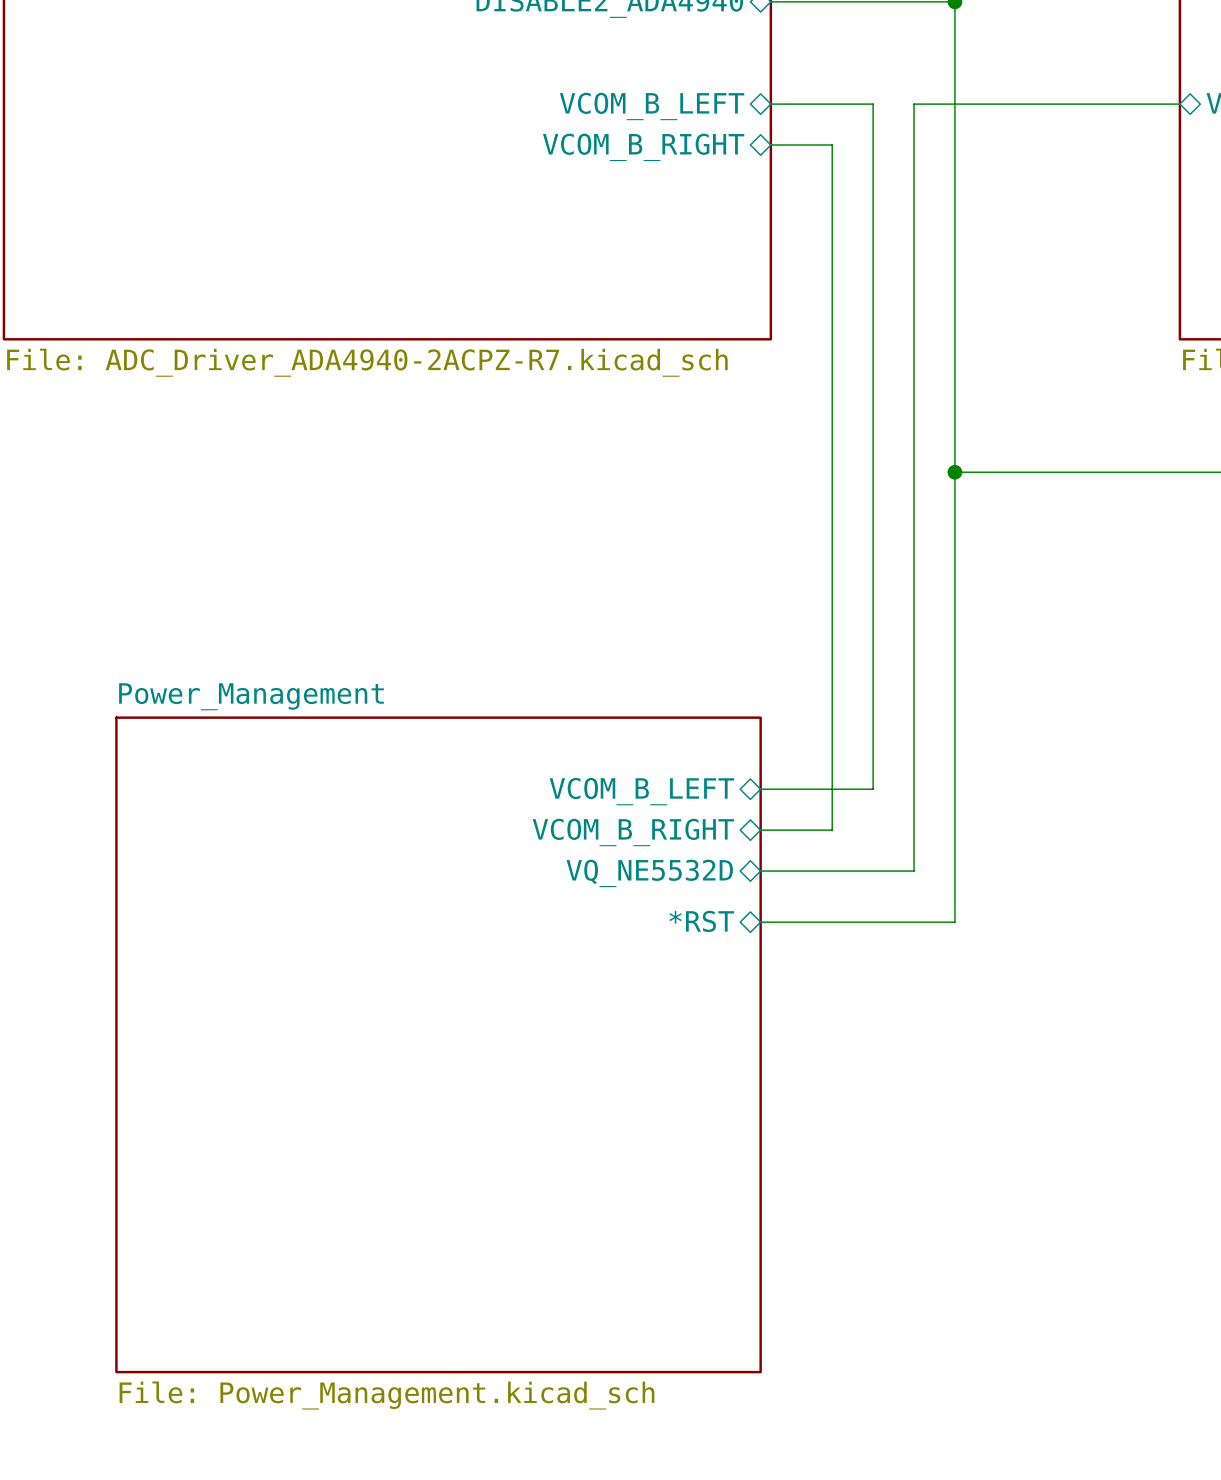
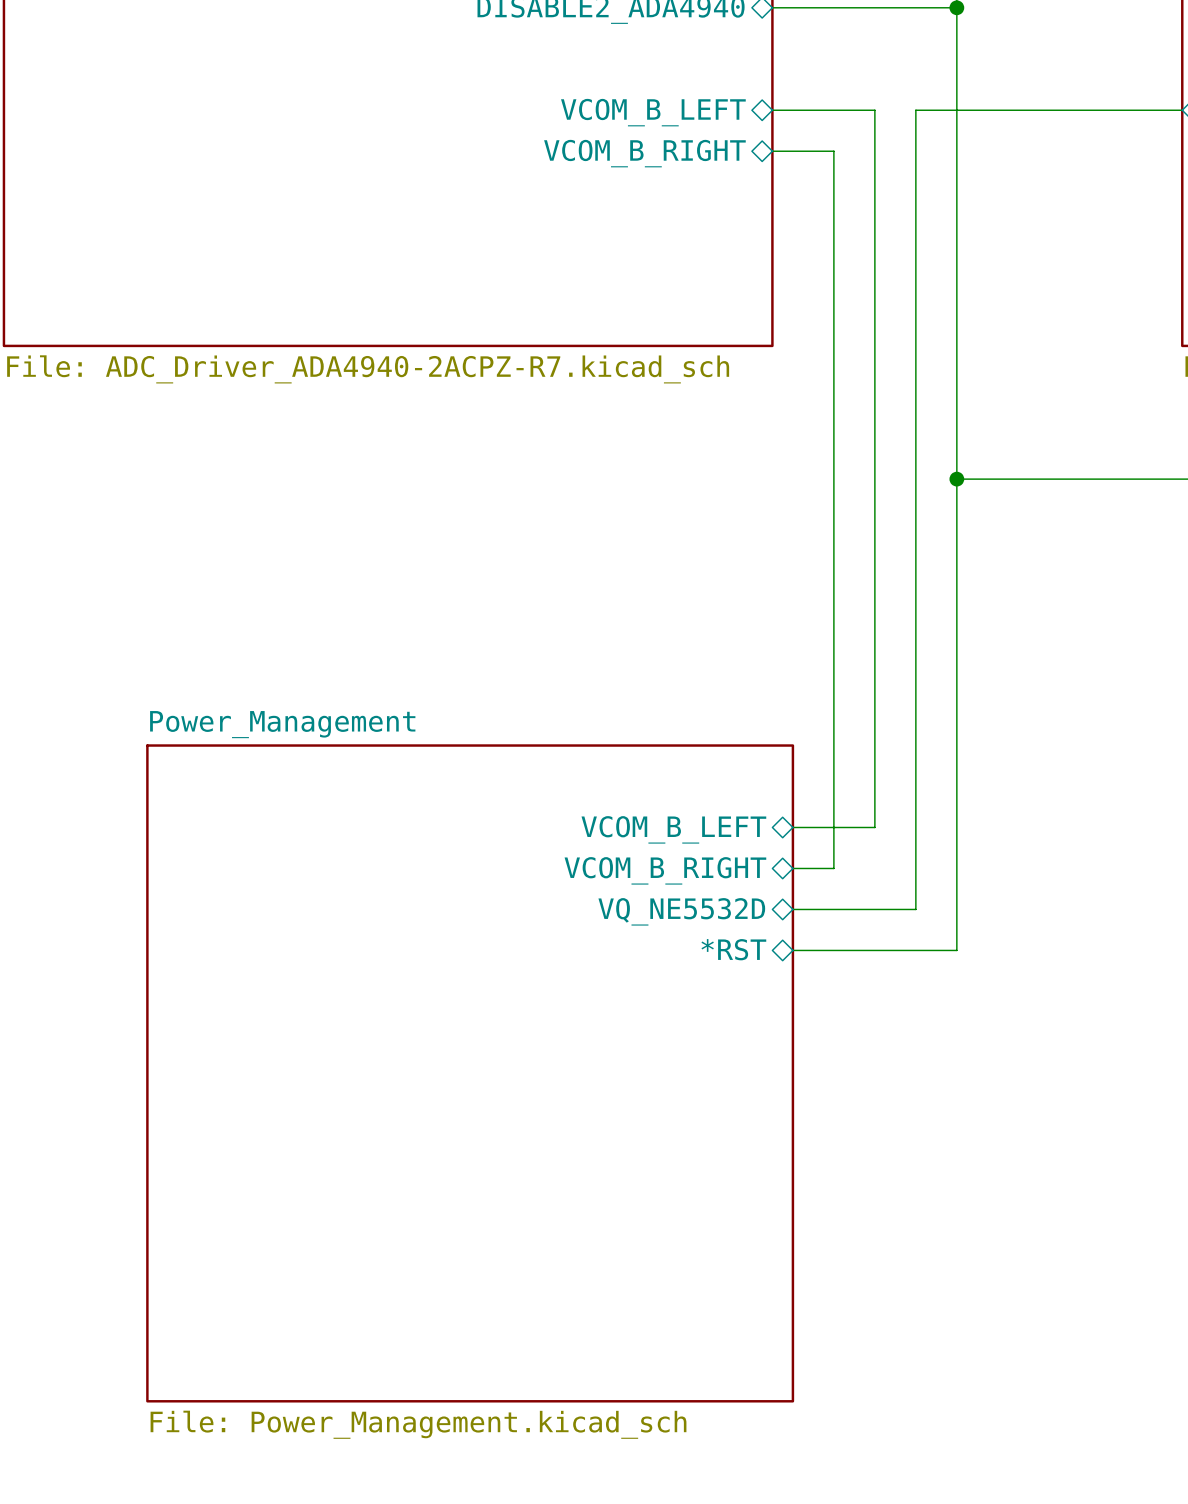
wire: (760, 789) (873, 789) -> (792, 827) (874, 827) (874, 796)
sheet pin position: VCOM_B_LEFT (641, 791) -> VCOM_B_LEFT (673, 829)
wire: (760, 830) (832, 830) -> (792, 868) (833, 868) (833, 837)
sheet pin position: VCOM_B_RIGHT (633, 832) -> VCOM_B_RIGHT (665, 870)
wire: (760, 871) (914, 871) -> (792, 909) (915, 909) (915, 878)
sheet pin position: VQ_NE5532D (649, 873) -> VQ_NE5532D (681, 911)
sheet pin position: *RST (701, 921) -> *RST (733, 949)
wire: (760, 922) (954, 922) -> (792, 950) (956, 950) (956, 929)
sheet Power_Management position: (438, 1044) -> (470, 1073)

